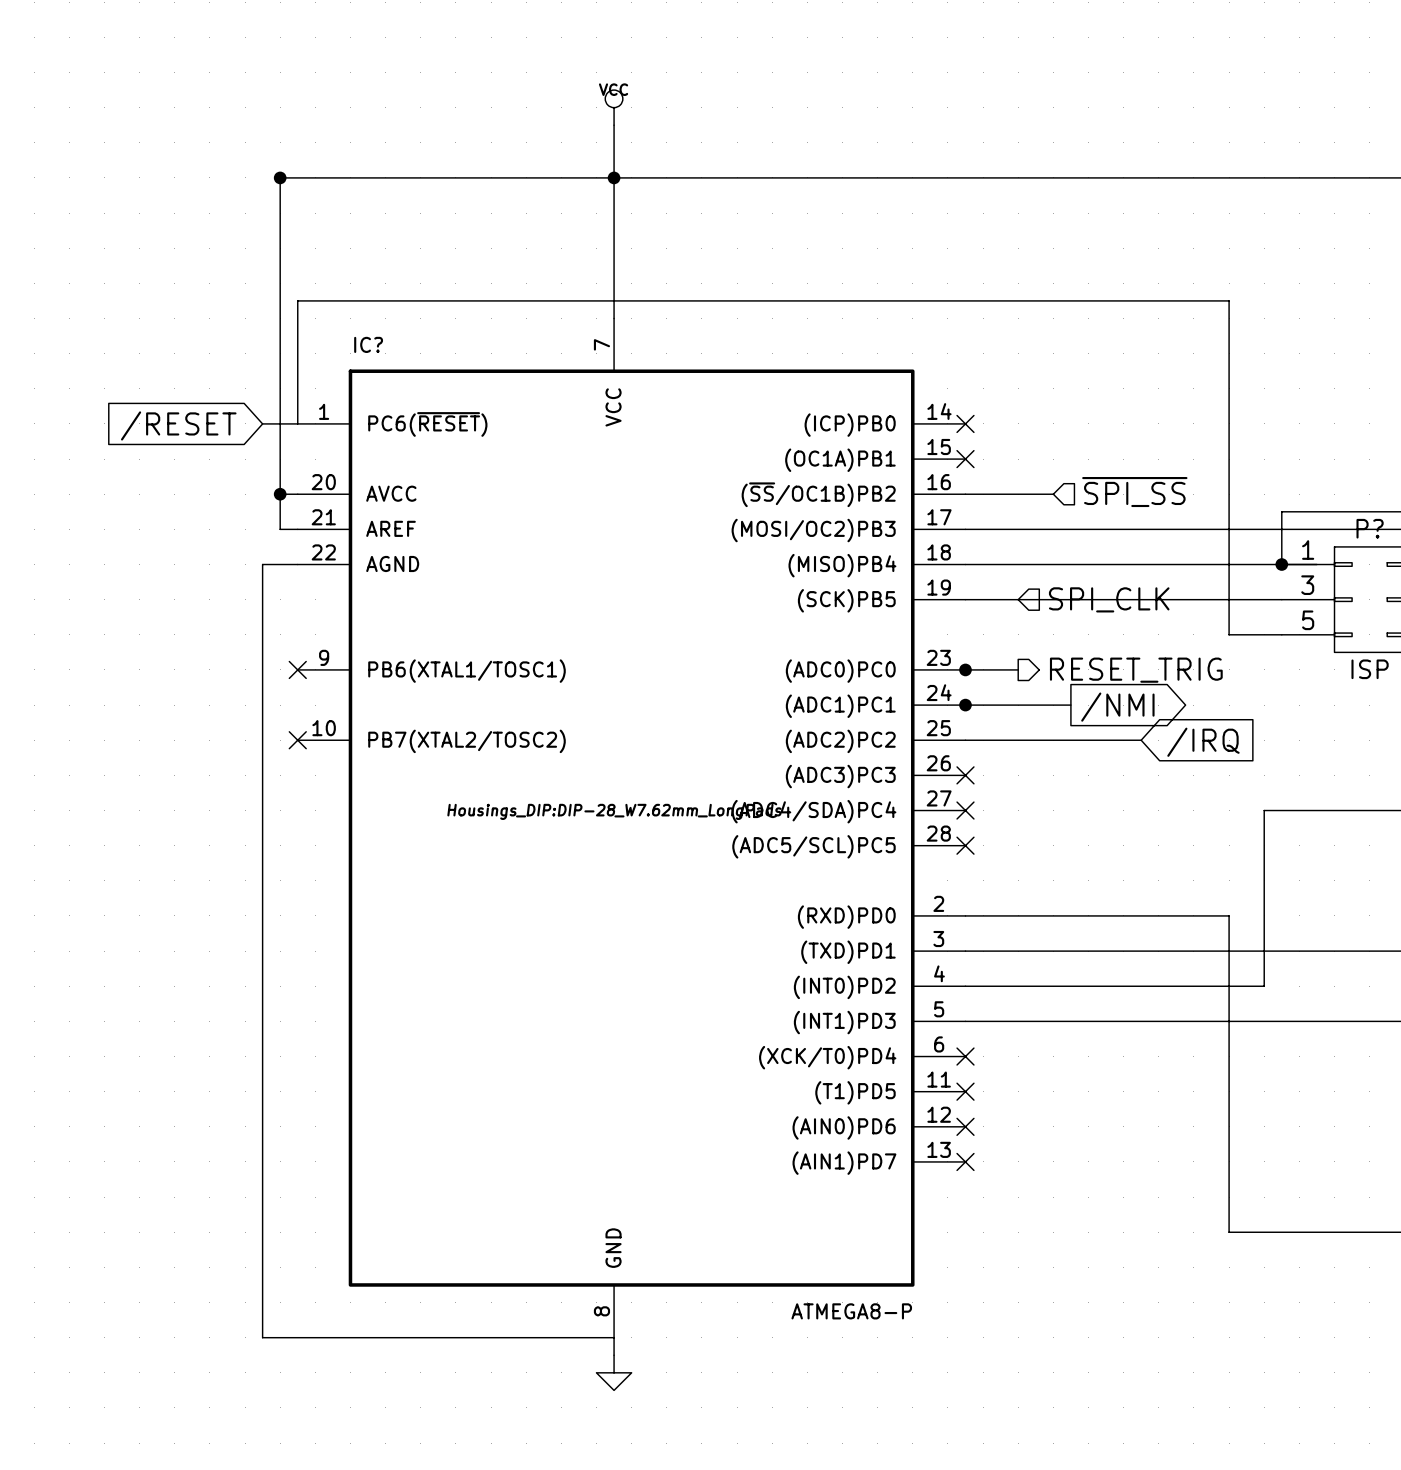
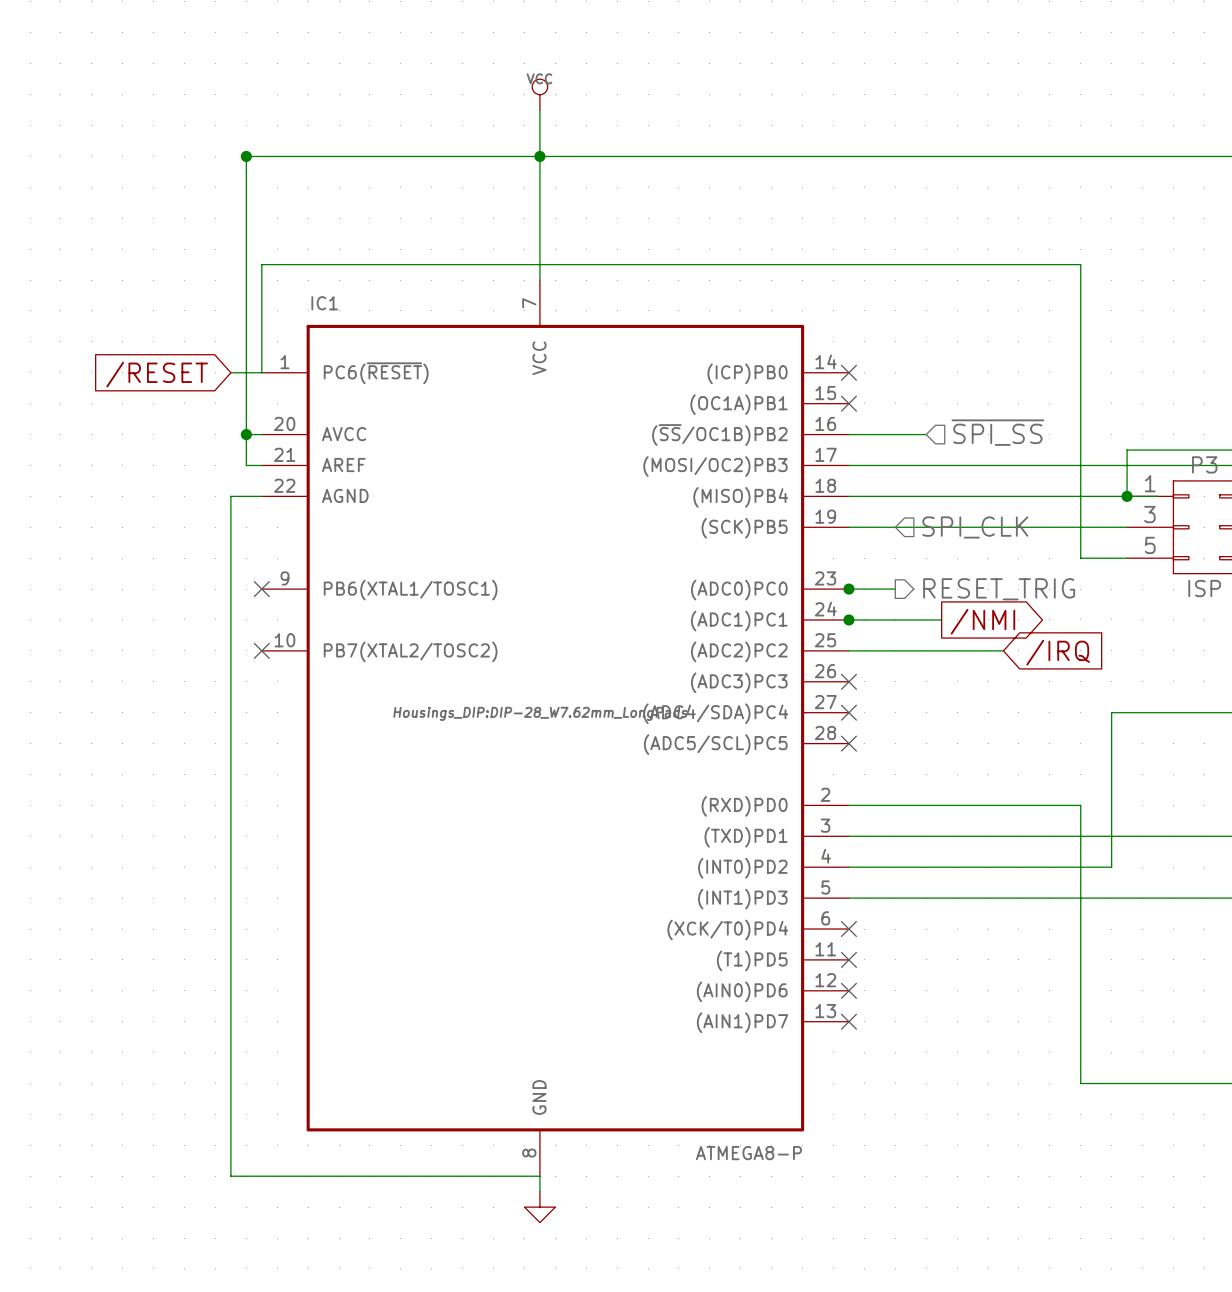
IC? name: IC? (368, 344) -> IC1 (324, 303)
P? name: P? (1370, 528) -> P3 (1204, 464)

